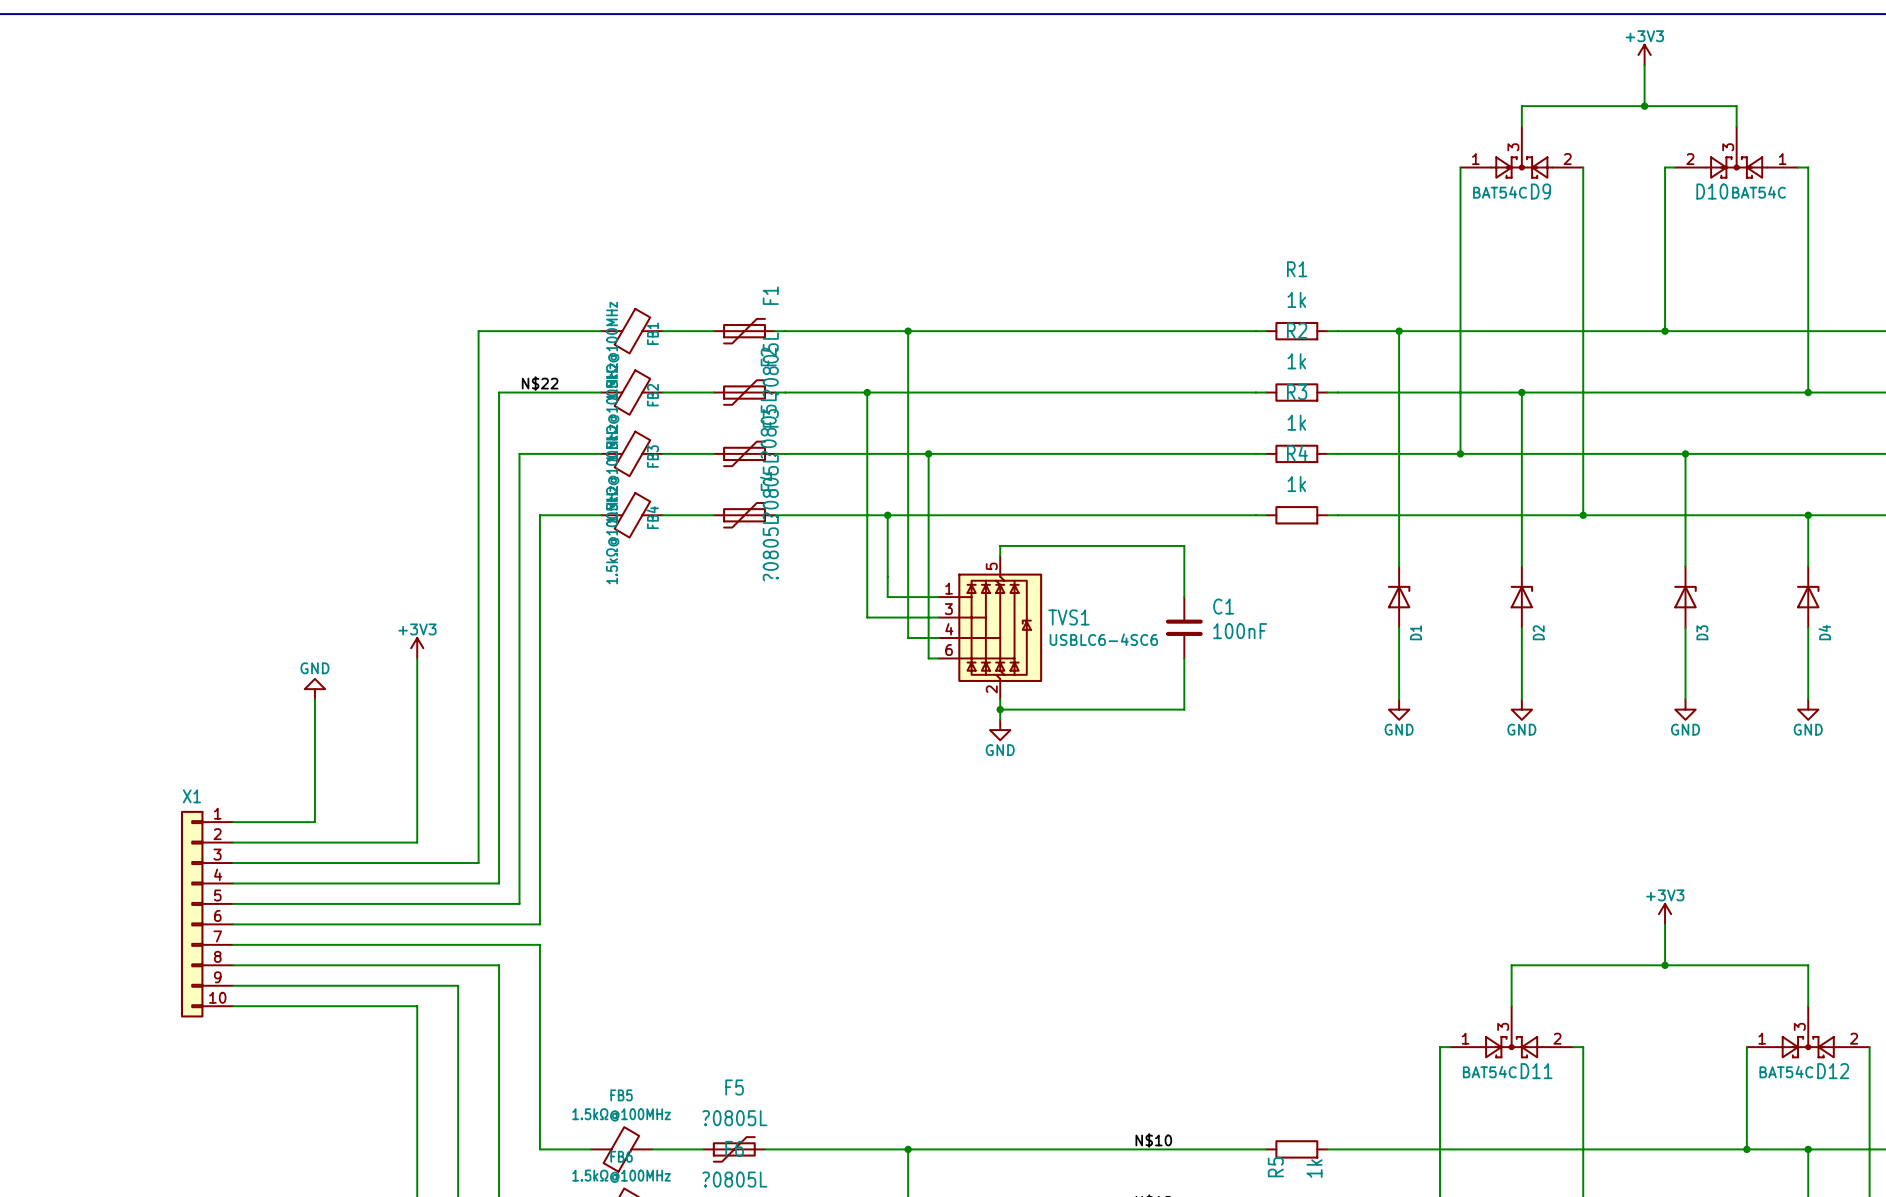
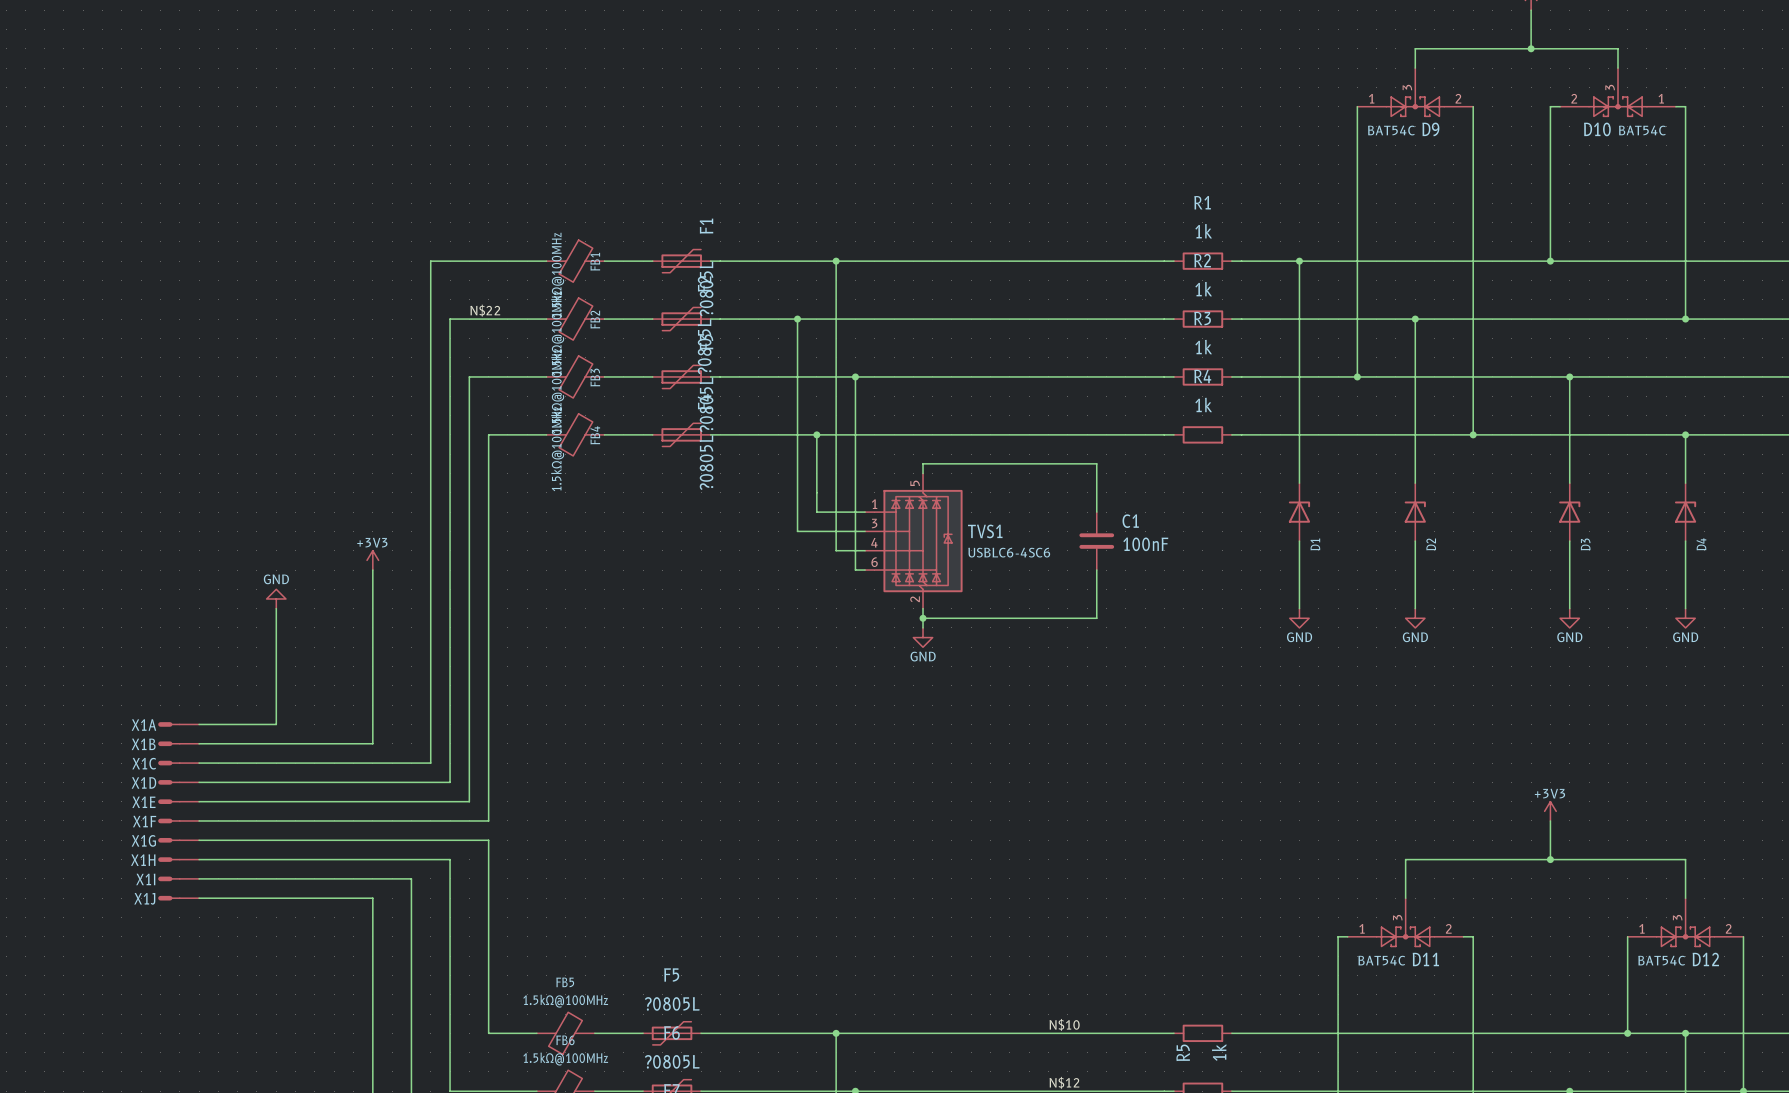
X1A: none -> (178, 724)
X1B: none -> (178, 743)
X1C: none -> (178, 763)
X1D: none -> (178, 782)
X1E: none -> (178, 801)
X1: (207, 914) -> none
X1F: none -> (178, 820)
X1G: none -> (178, 840)
X1H: none -> (178, 859)
X1I: none -> (178, 878)
X1J: none -> (178, 898)

